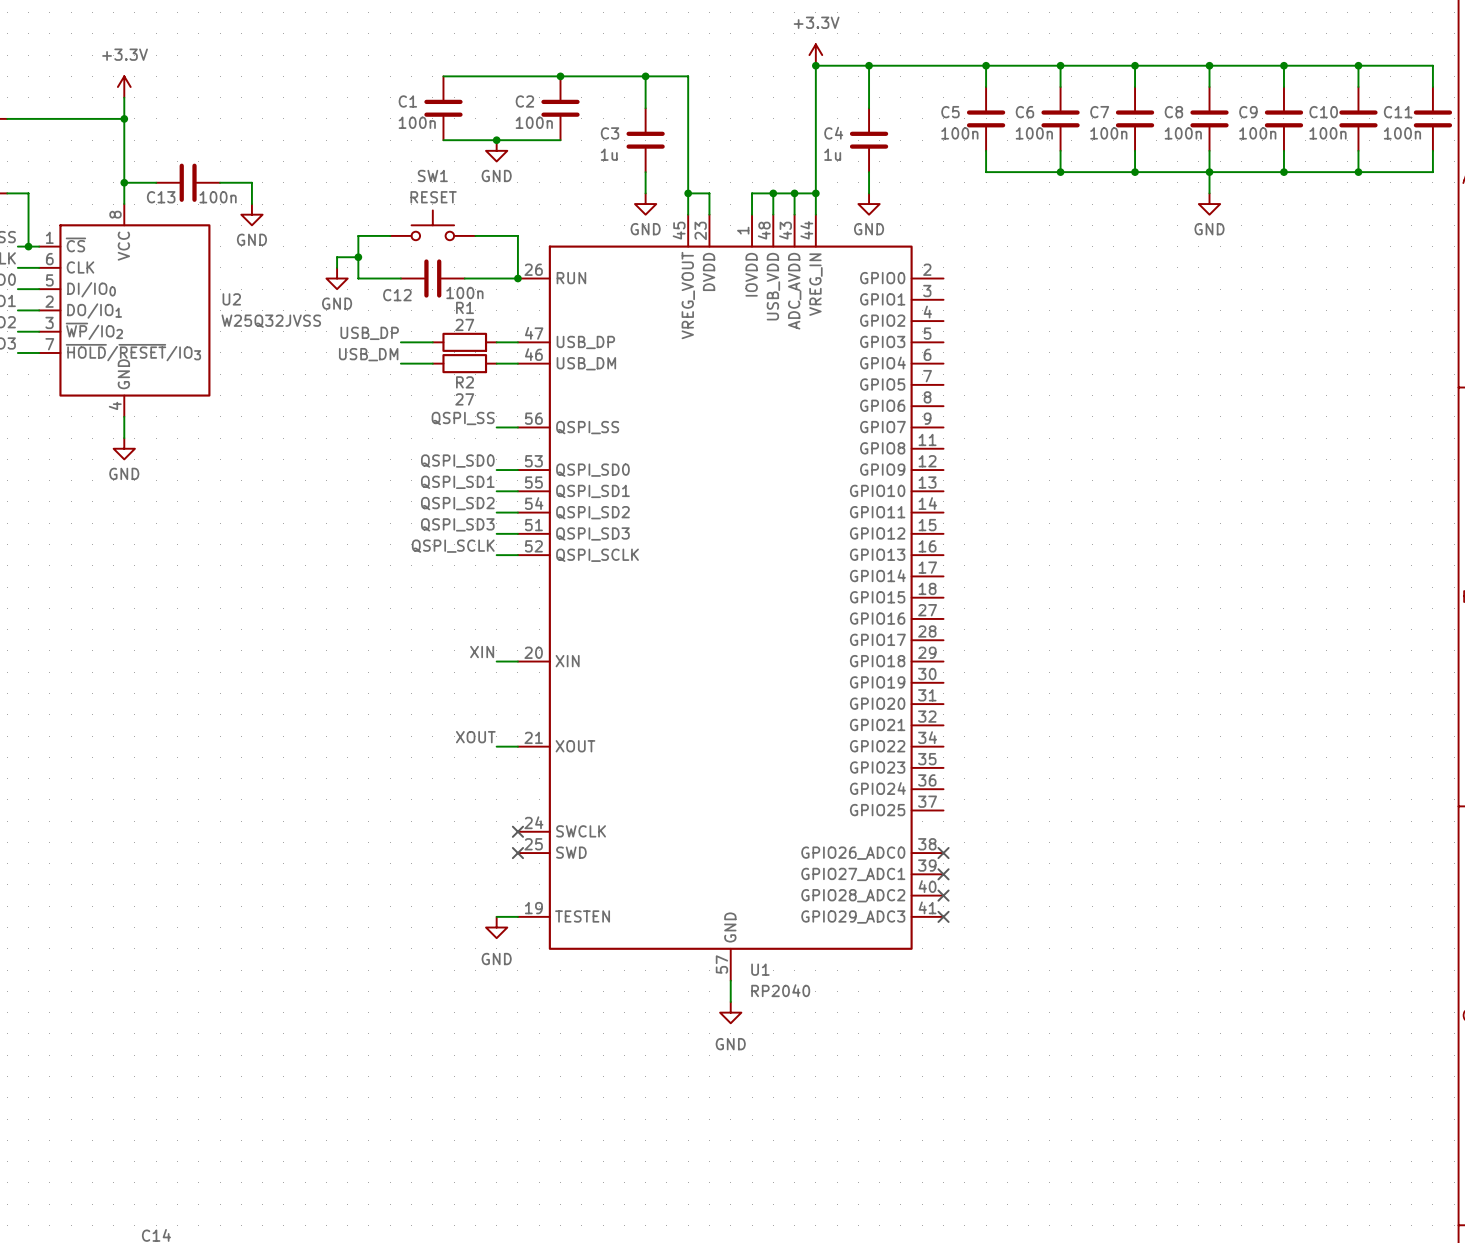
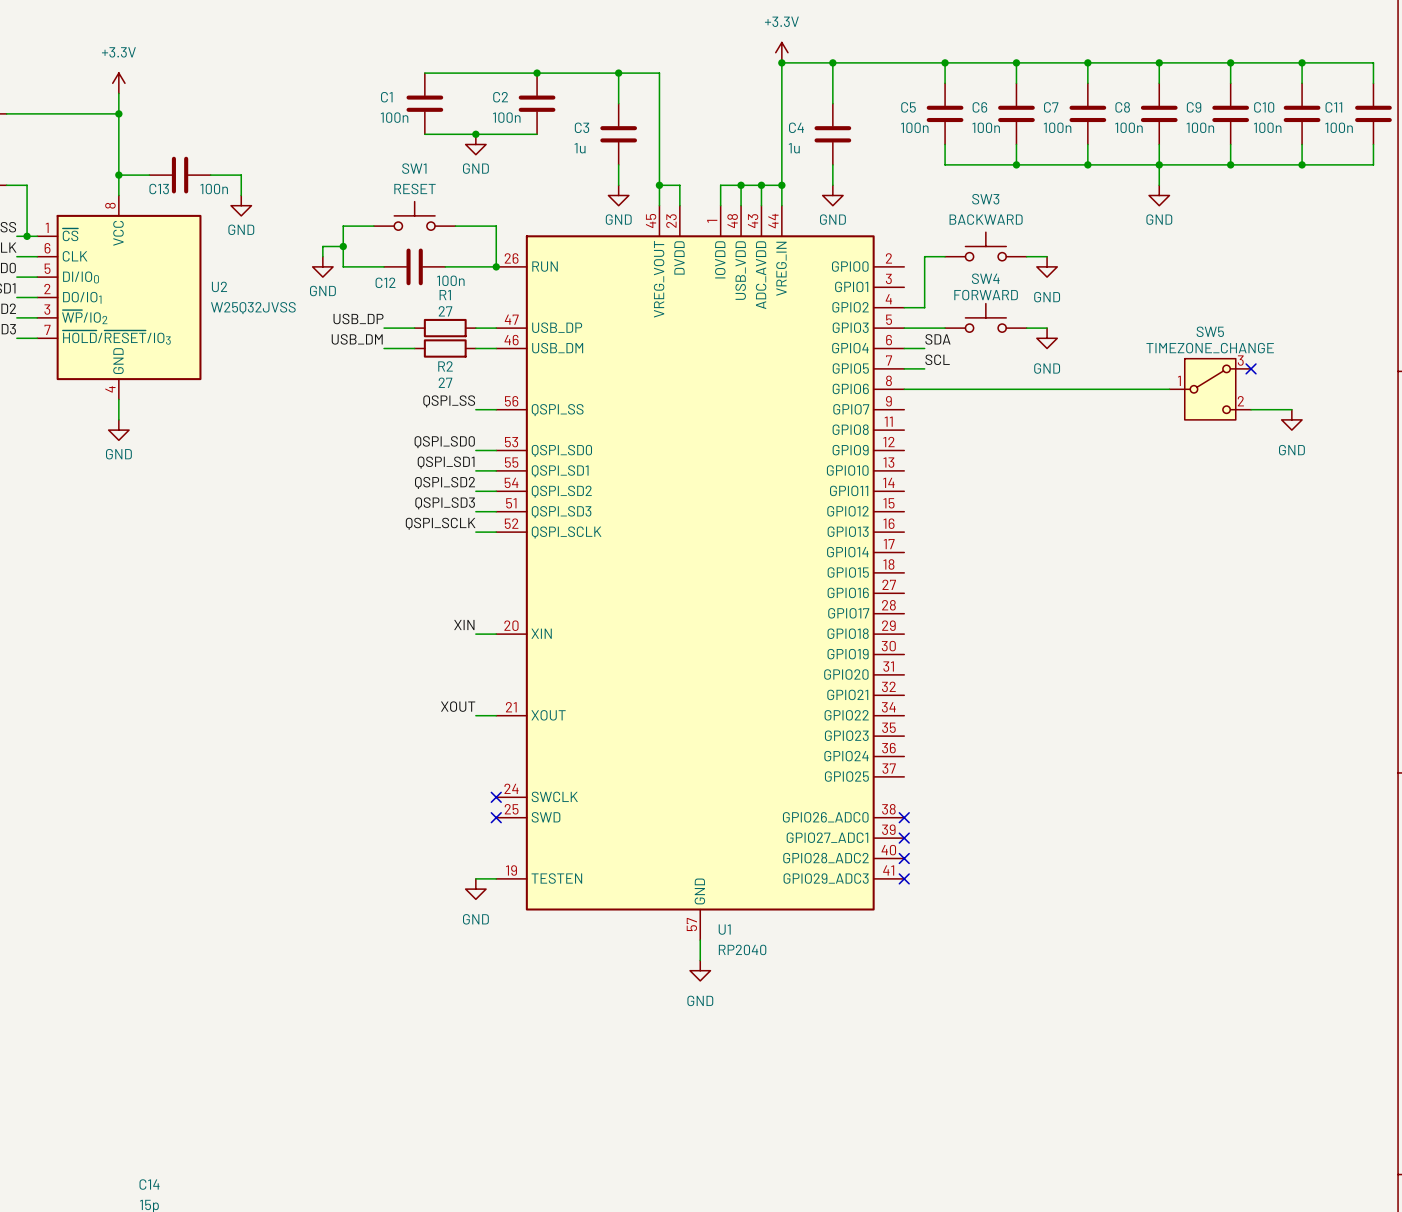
SW3: none -> BACKWARD (985, 246)
wire: none -> (945, 256) (924, 256) (924, 307) (904, 307)
wire: none -> (1026, 256) (1047, 256)
power symbol: none -> GND (1047, 266)
SW4: none -> FORWARD (985, 317)
wire: none -> (904, 328) (945, 328)
wire: none -> (1026, 328) (1047, 328)
power symbol: none -> GND (1047, 338)
label: none -> SDA (937, 339)
wire: none -> (904, 348) (924, 348)
label: none -> SCL (937, 359)
wire: none -> (904, 368) (924, 368)
no-connect mark: none -> (1251, 368)
wire: none -> (904, 389) (1169, 389)
SW5: none -> TIMEZONE_CHANGE (1210, 389)
wire: none -> (1251, 409) (1291, 409)
power symbol: none -> GND (1291, 419)

